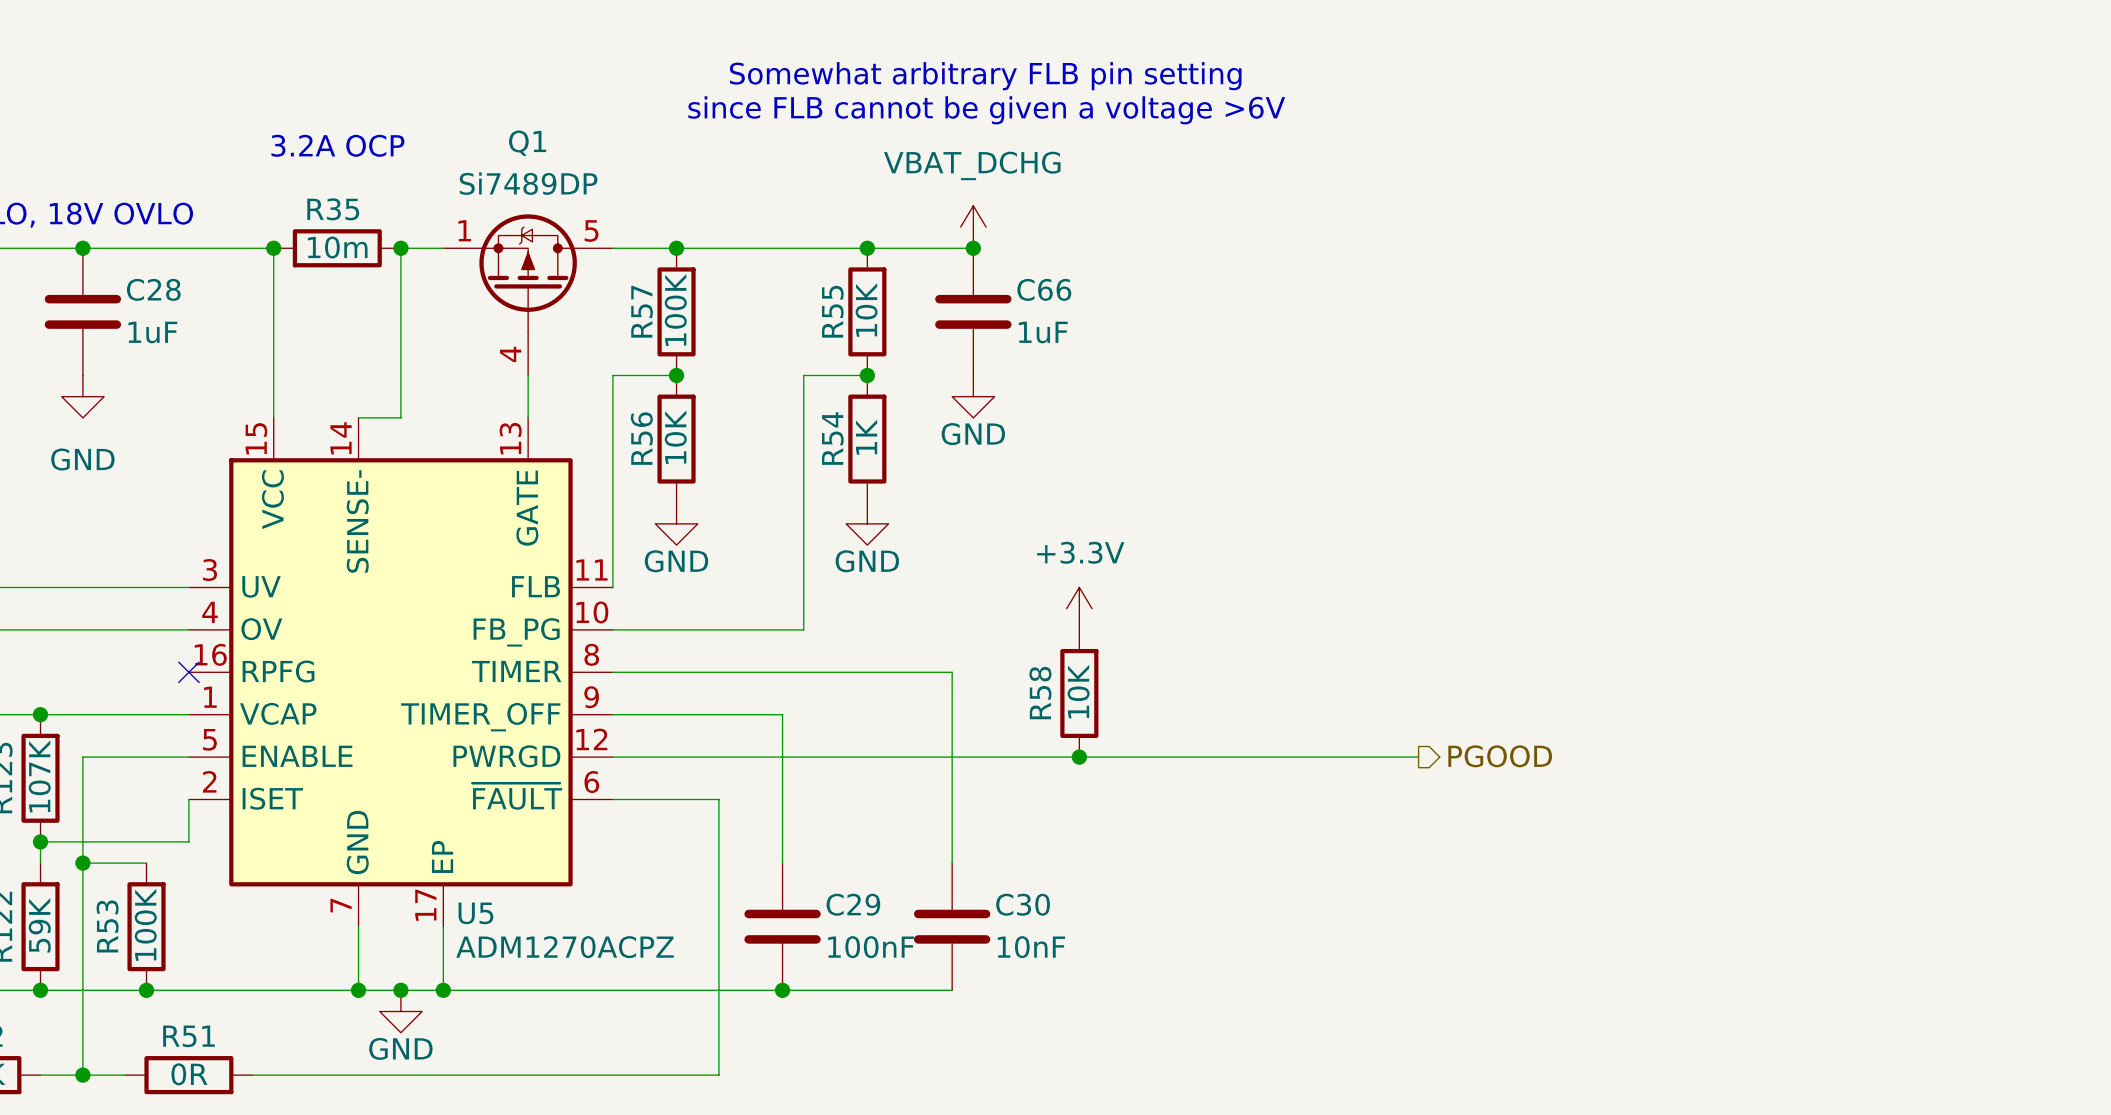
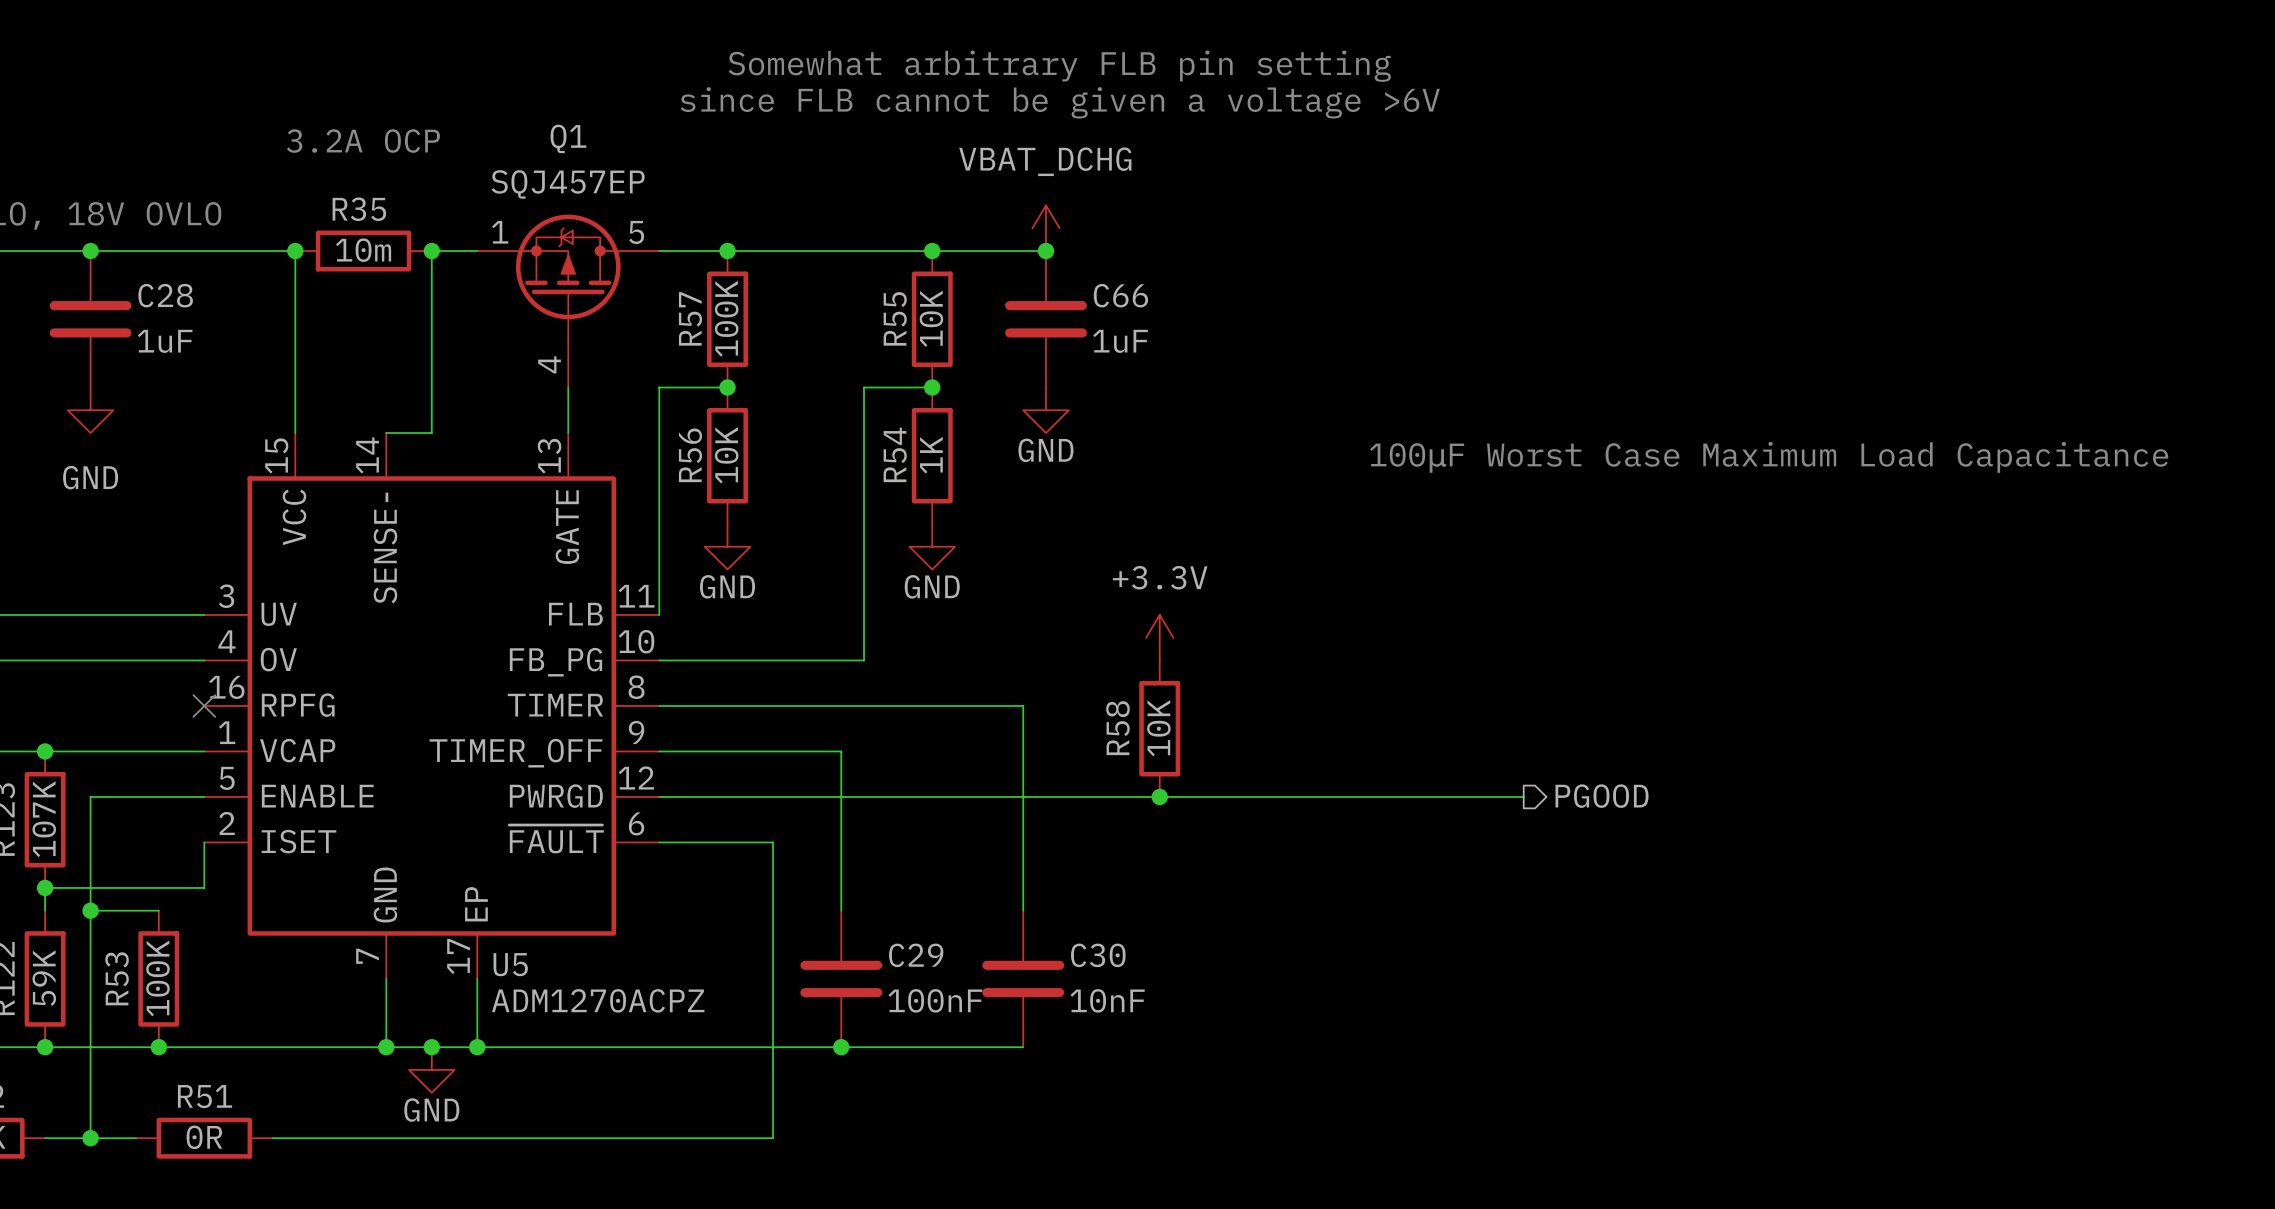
Q1 value: Si7489DP (528, 183) -> SQJ457EP (568, 184)
text: none -> 100μF Worst Case Maximum Load Capacitance (1769, 457)

